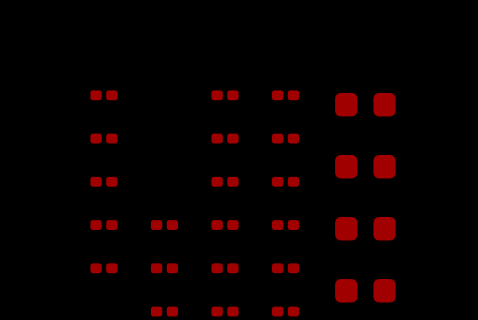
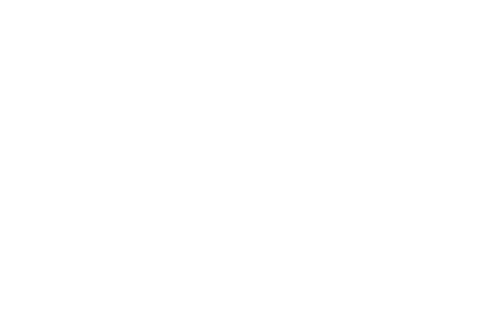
part: (103, 95) -> none
part: (225, 95) -> none
part: (285, 95) -> none
part: (365, 104) -> none
part: (103, 138) -> none
part: (225, 138) -> none
part: (285, 138) -> none
part: (365, 166) -> none
part: (103, 181) -> none
part: (225, 181) -> none
part: (285, 181) -> none
part: (103, 225) -> none
part: (164, 225) -> none
part: (225, 225) -> none
part: (285, 225) -> none
part: (365, 228) -> none
part: (103, 268) -> none
part: (164, 268) -> none
part: (225, 268) -> none
part: (285, 268) -> none
part: (365, 290) -> none
part: (164, 311) -> none
part: (225, 311) -> none
part: (285, 311) -> none

